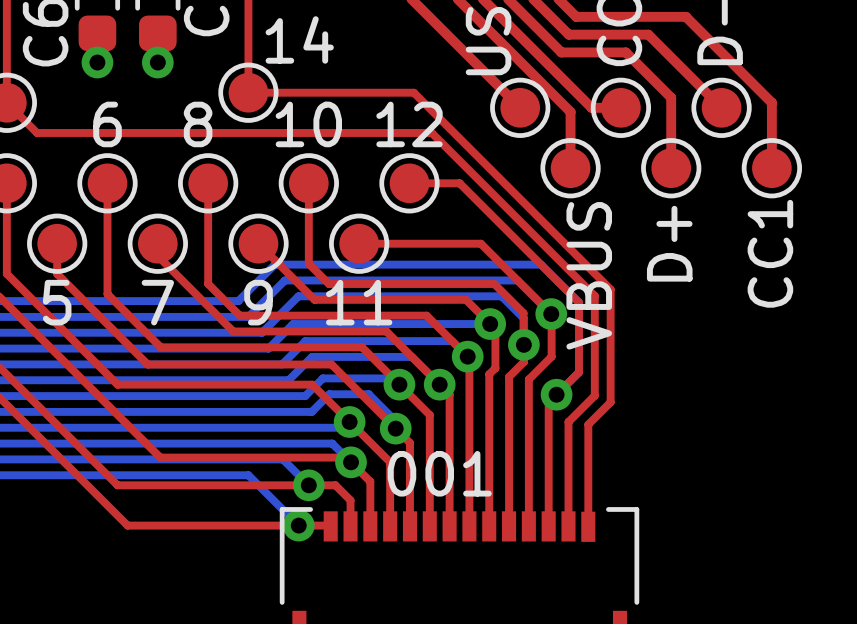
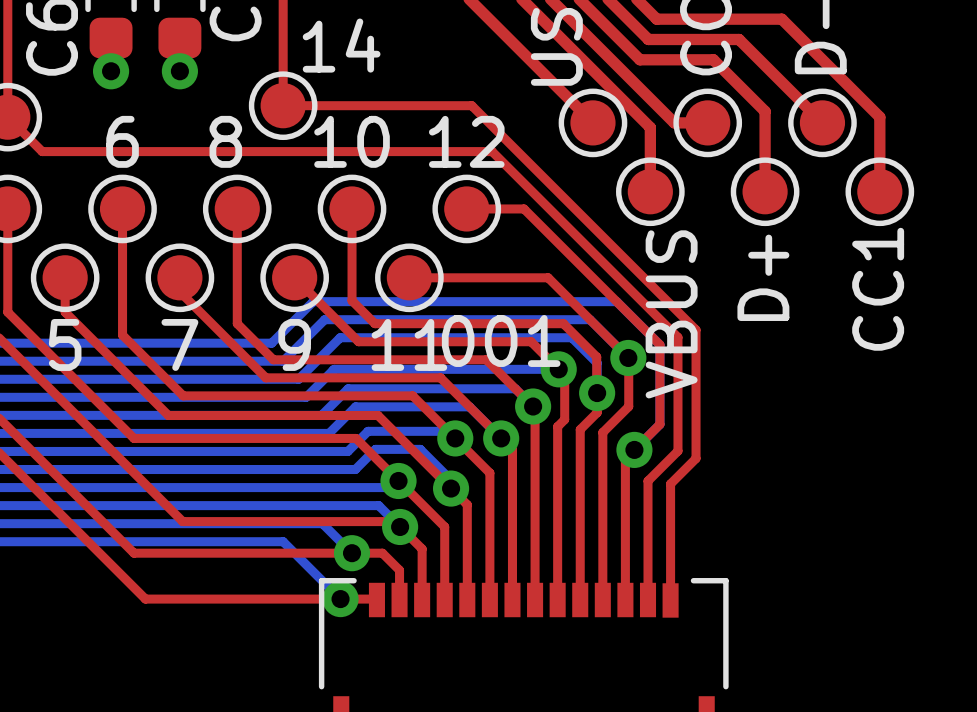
part value position: 001 (439, 473) -> 001 (501, 340)

